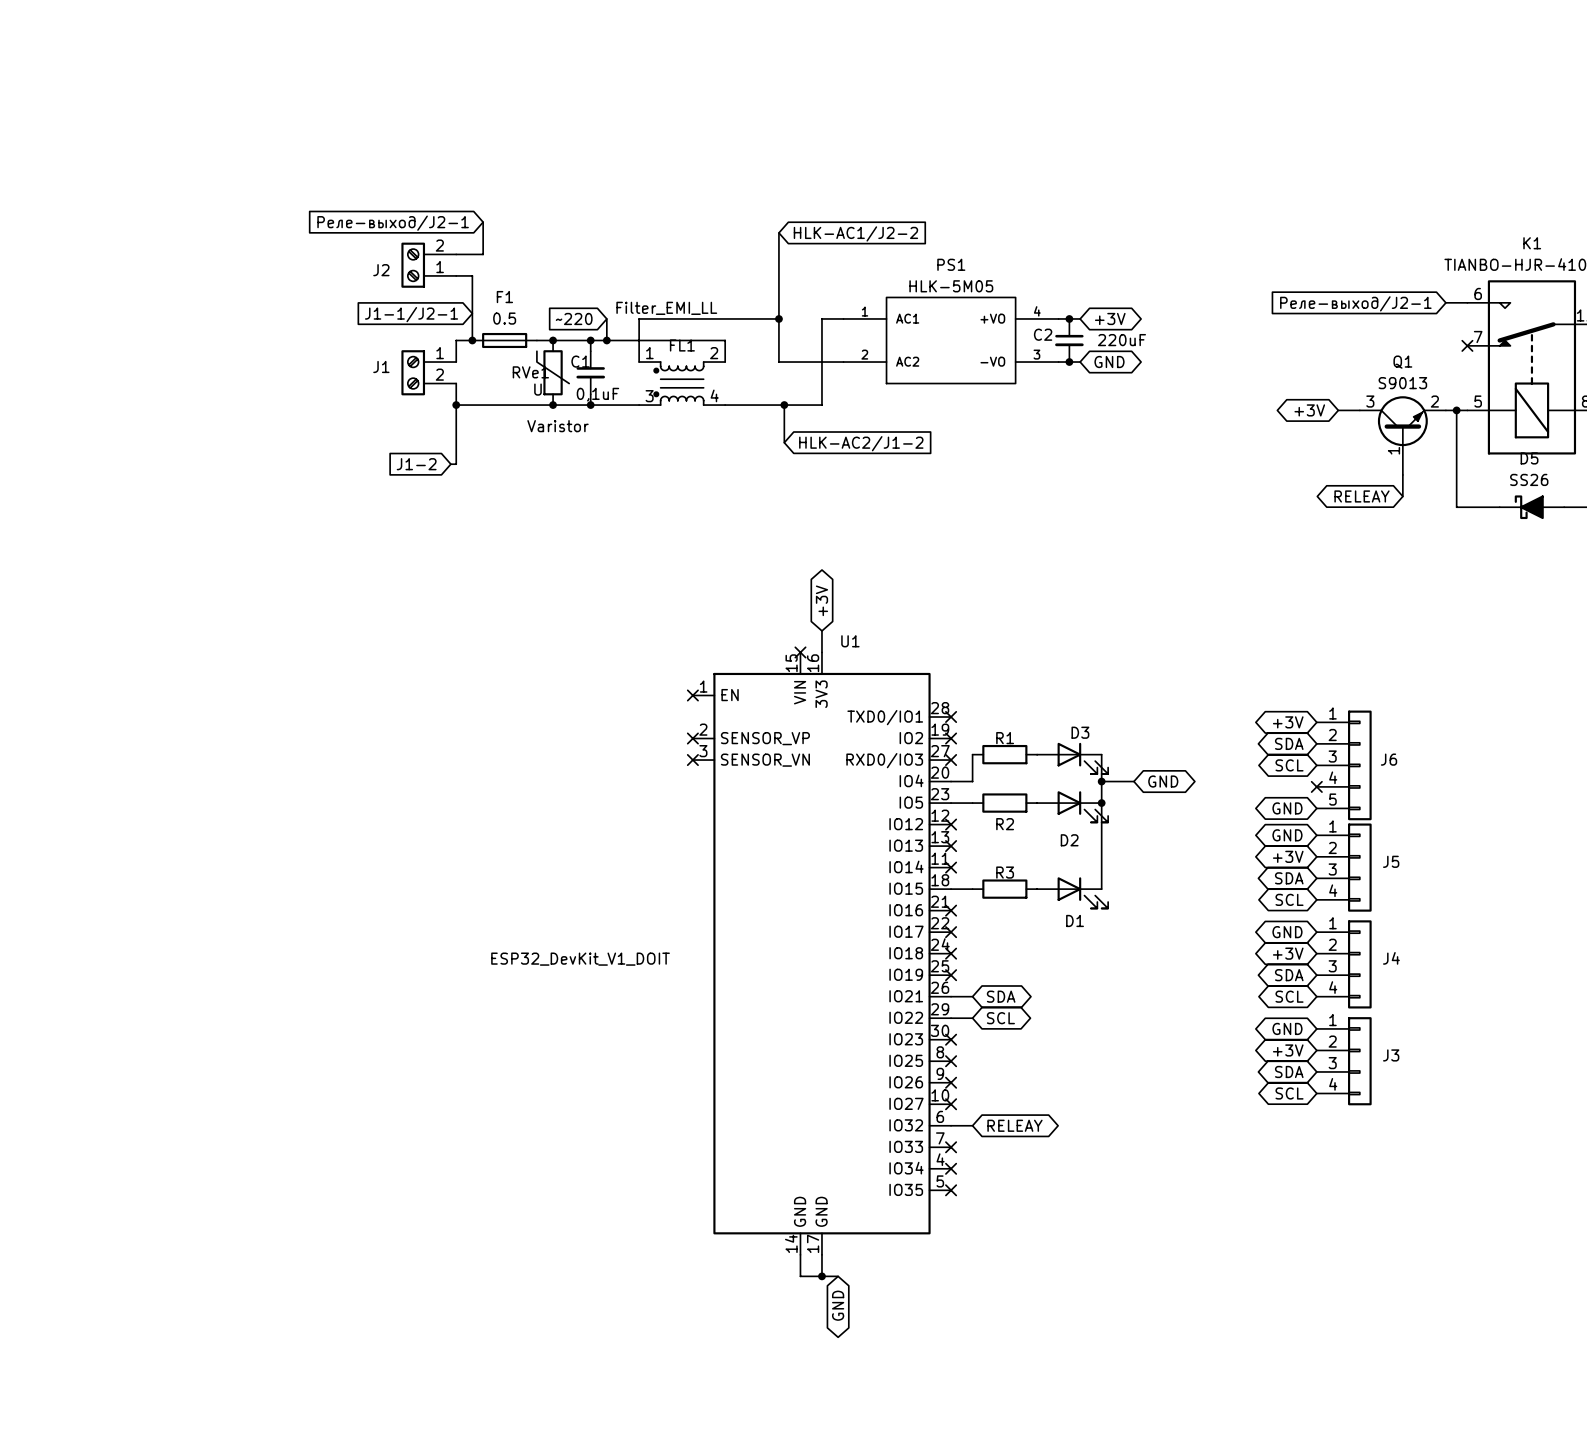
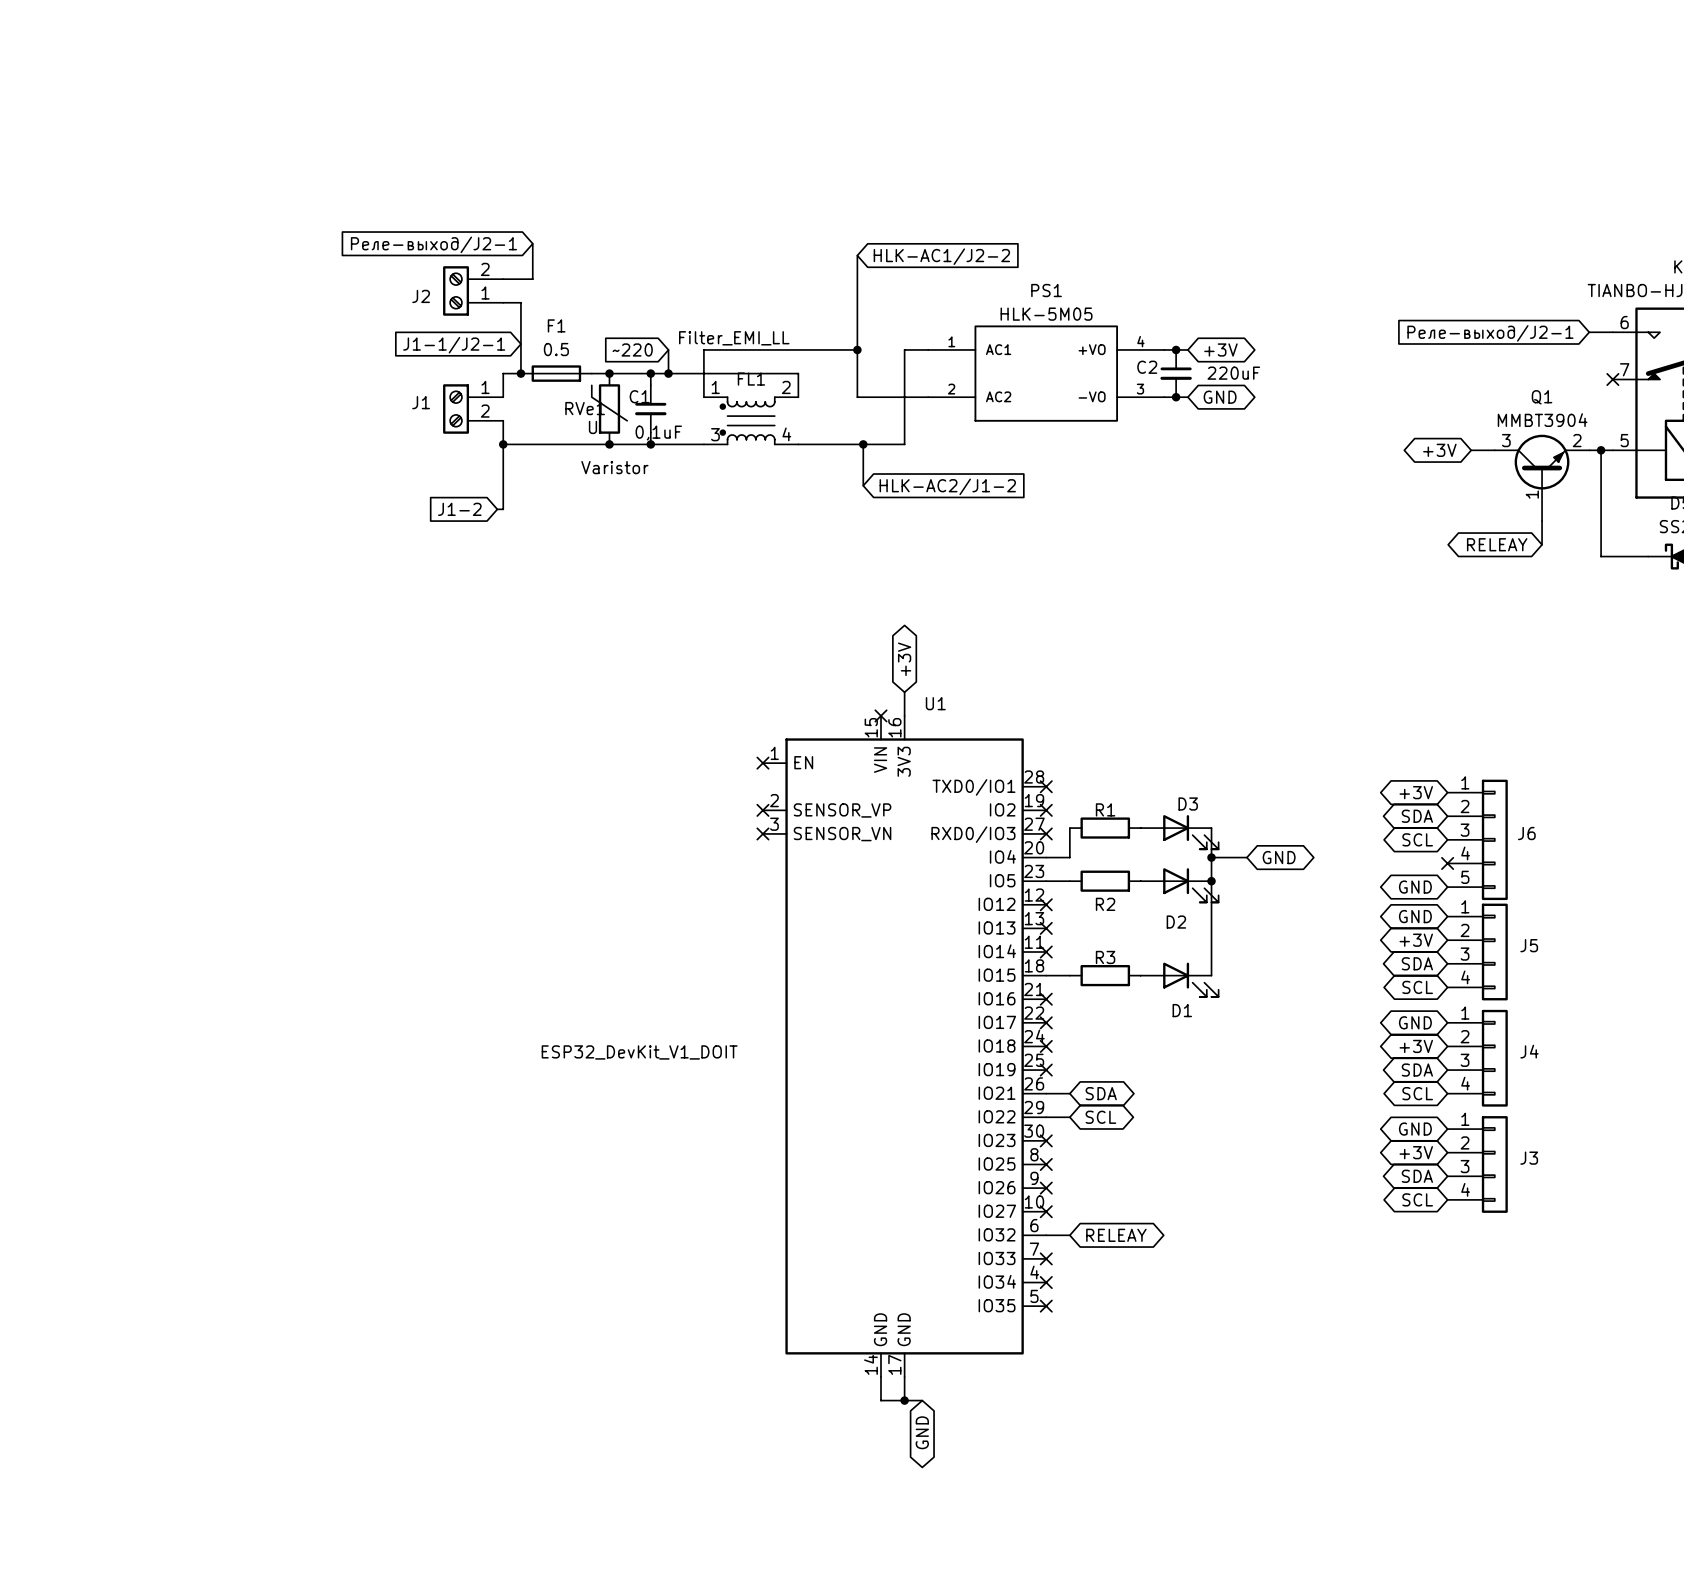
Q1 value: S9013 (1402, 383) -> MMBT3904 (1542, 420)

